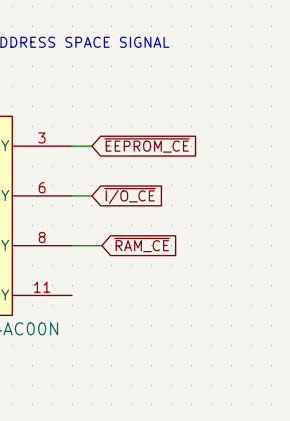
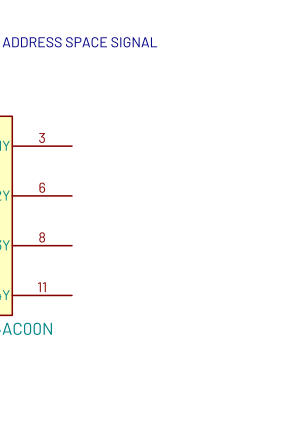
global label: ~{EEPROM_CE} (147, 145) -> none
wire: (72, 146) (91, 146) -> none
wire: (72, 195) (91, 195) -> none
global label: ~{I/O_CE} (129, 195) -> none
wire: (72, 245) (101, 245) -> none
global label: ~{RAM_CE} (142, 245) -> none

